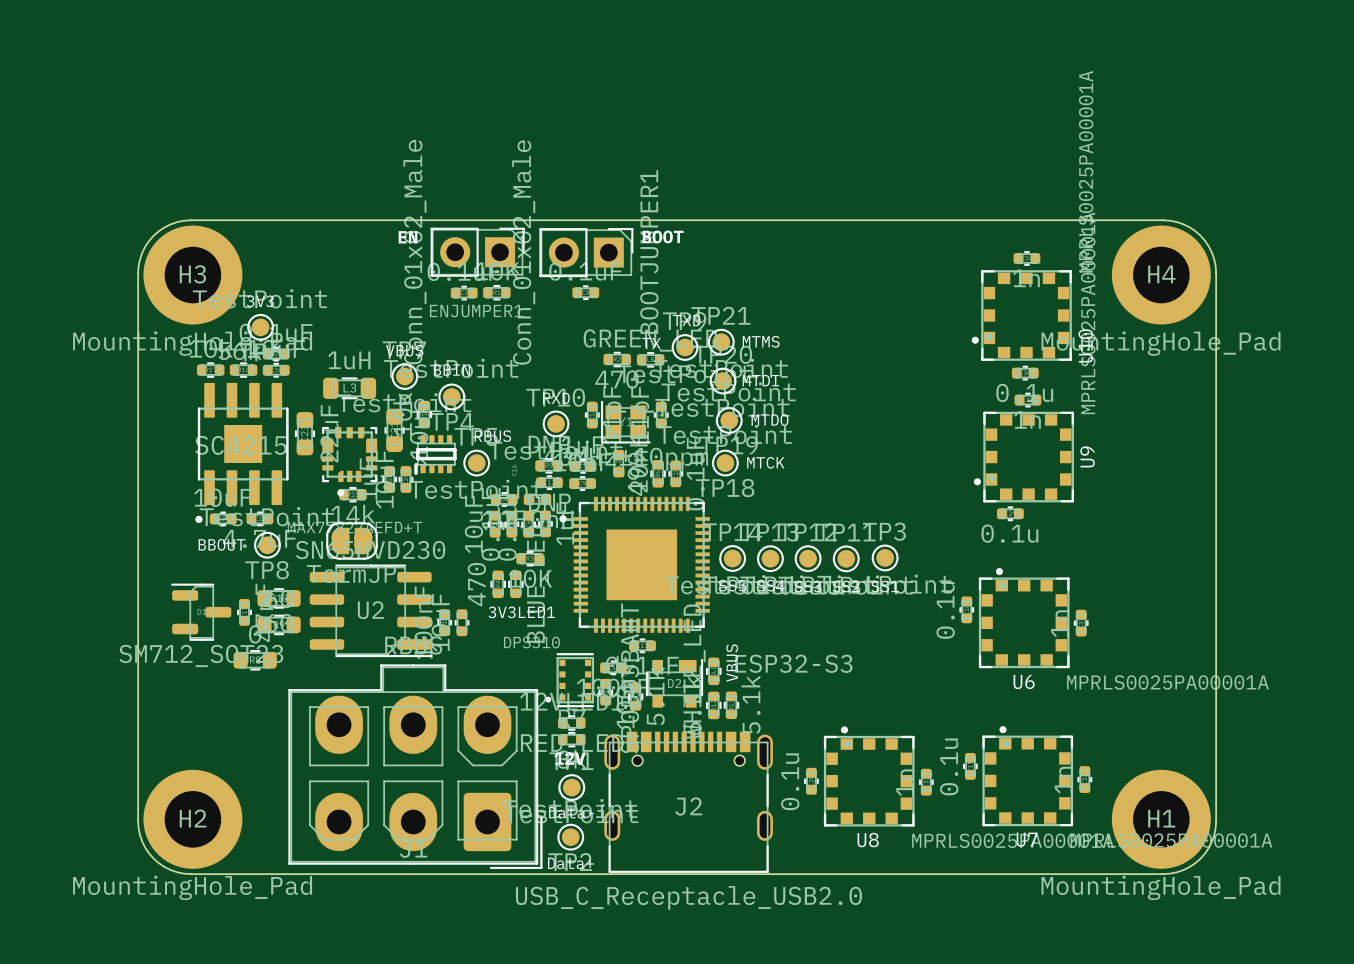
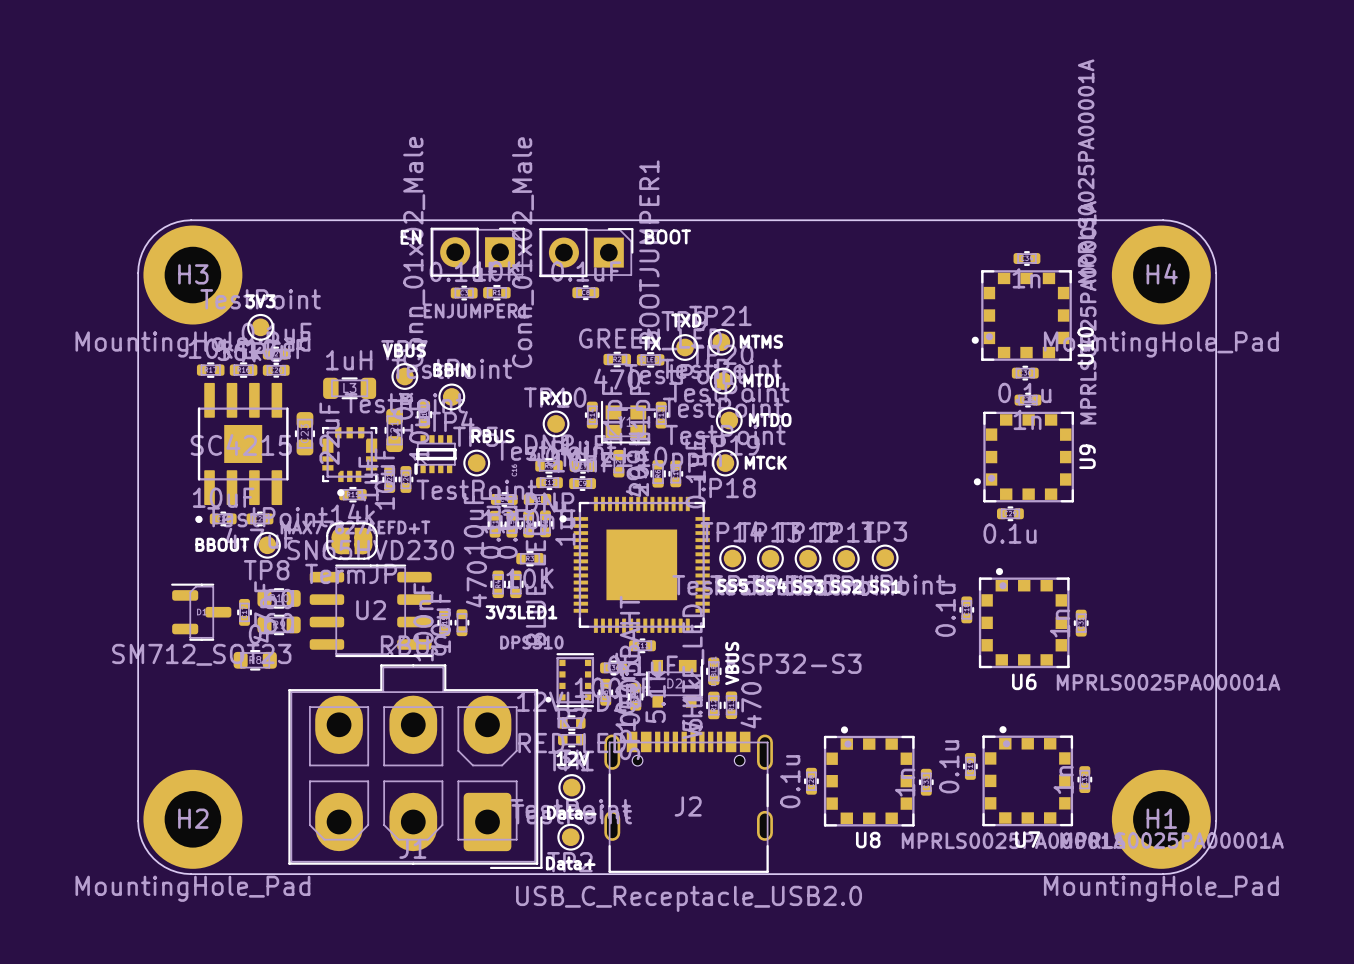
part value: 5.1k (751, 704) -> 470 (751, 705)

